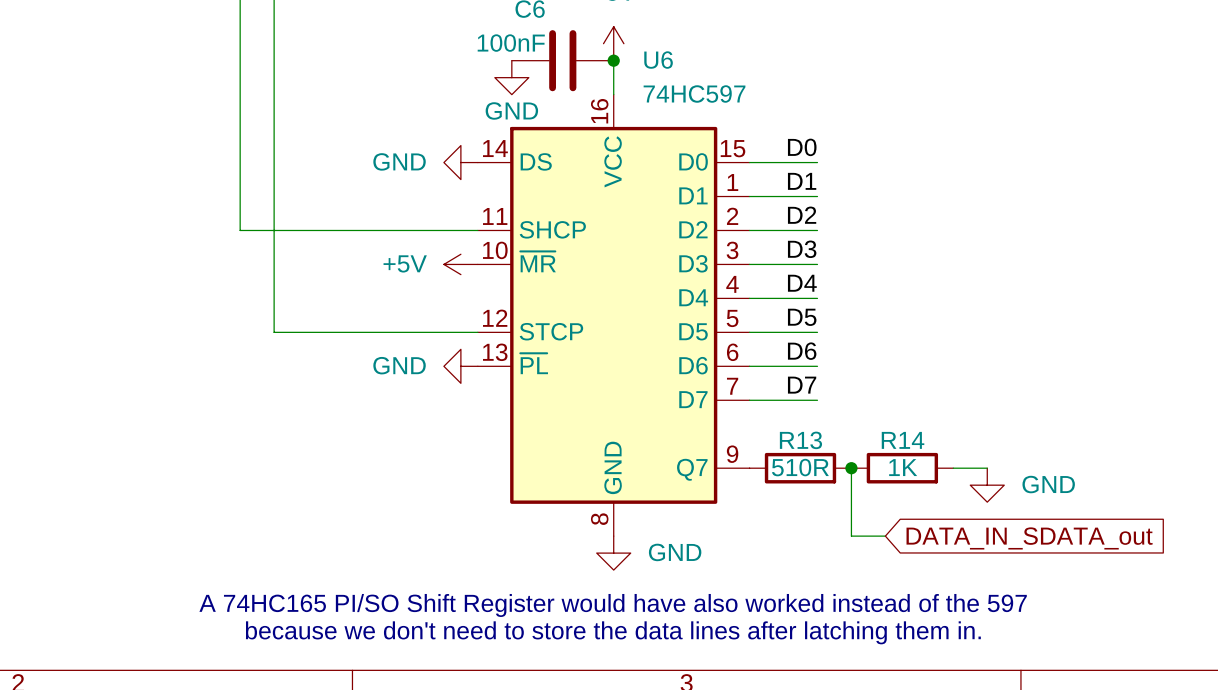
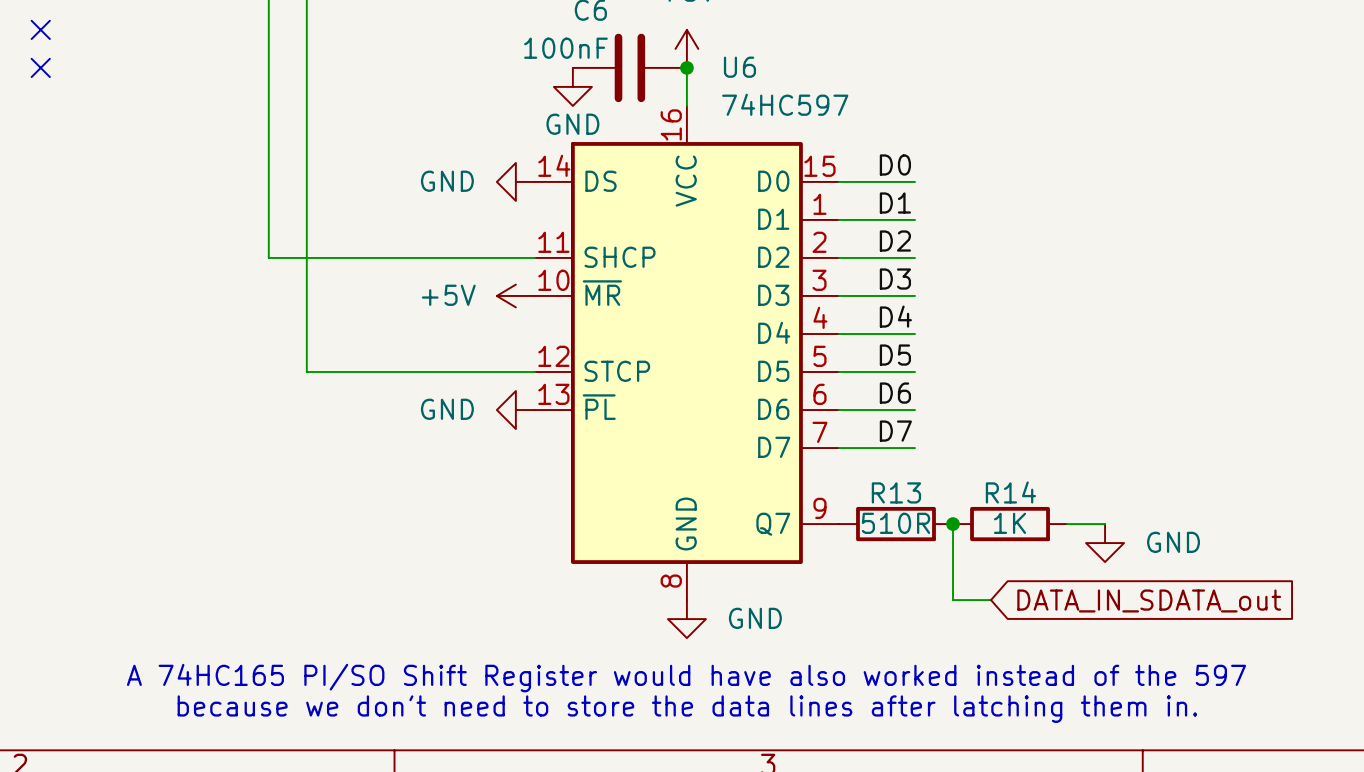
no-connect mark: none -> (40, 29)
no-connect mark: none -> (40, 67)

